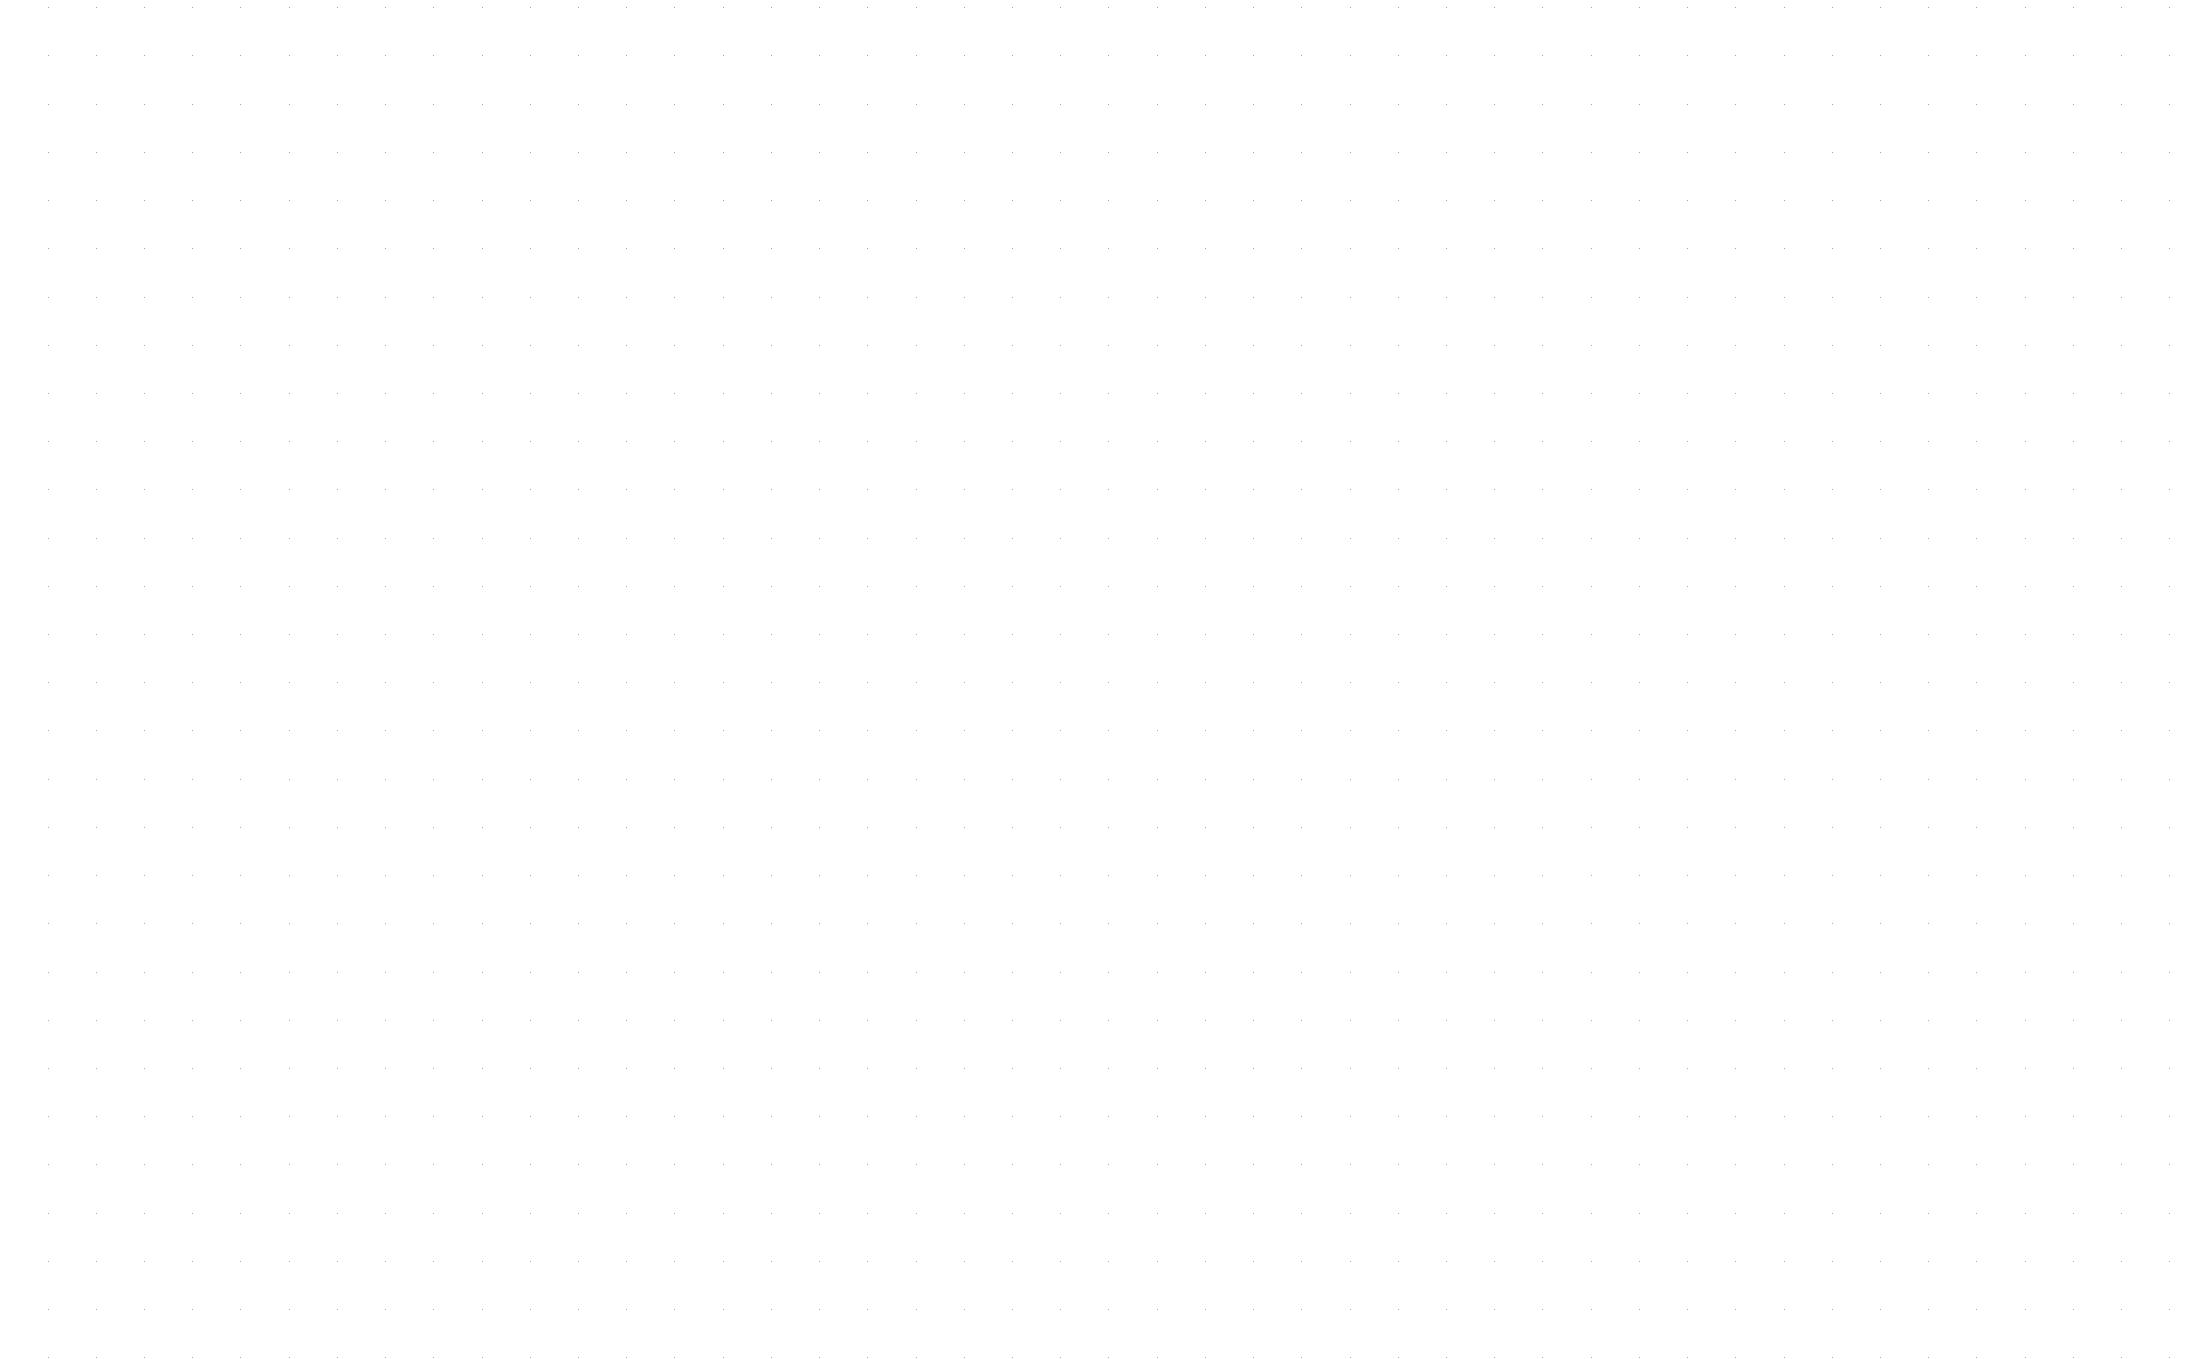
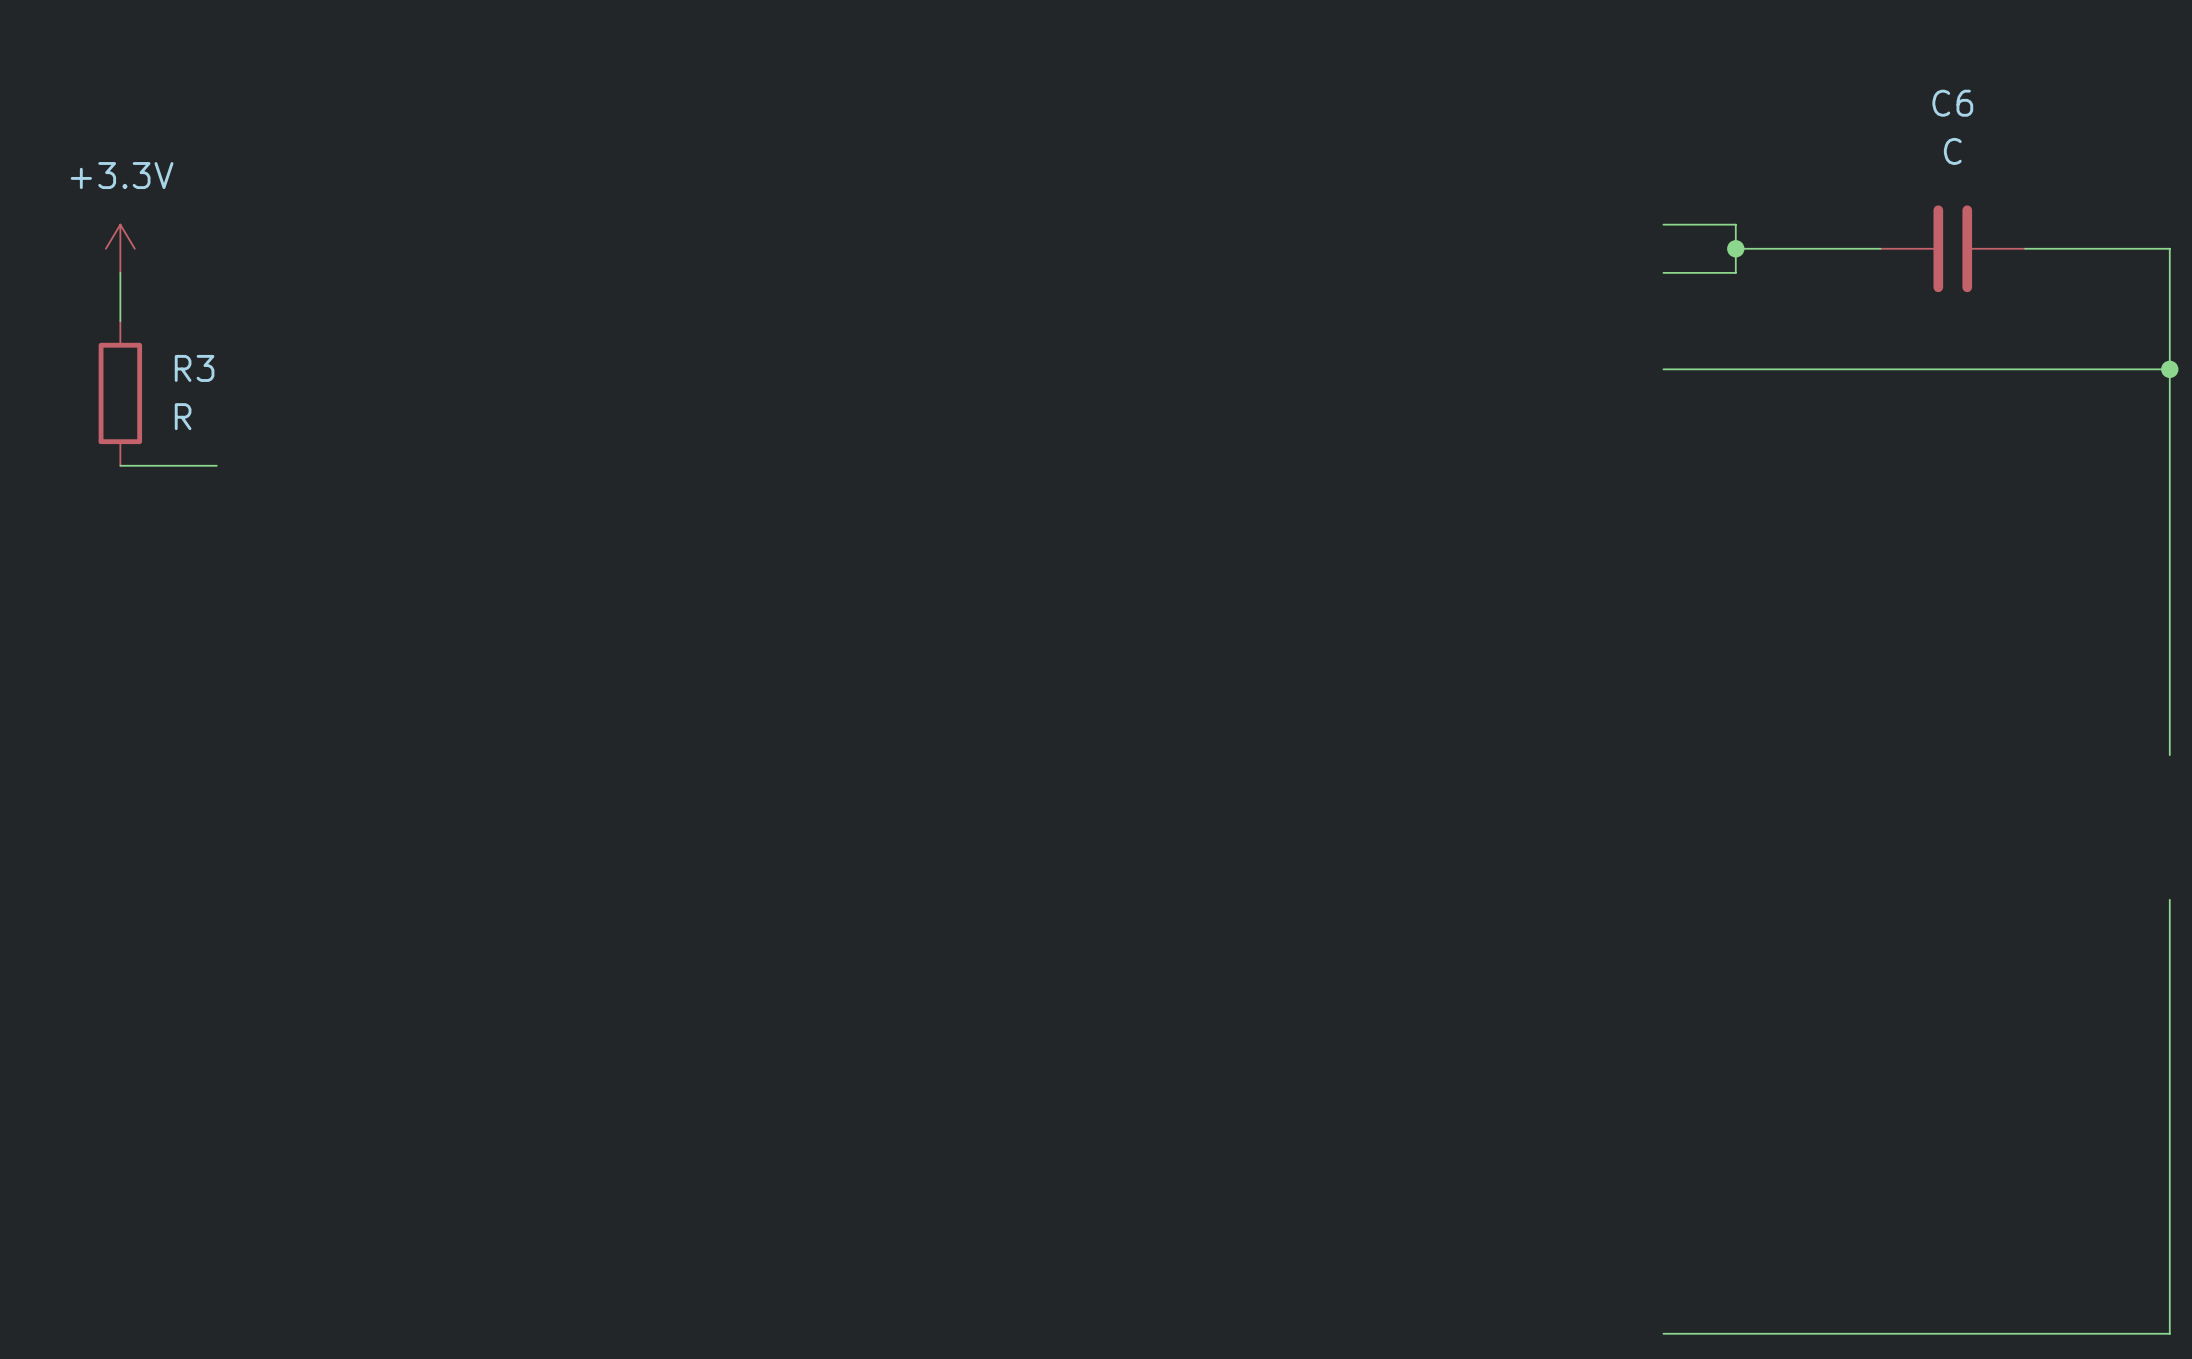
wire: none -> (1663, 224) (1735, 224) (1735, 272) (1663, 272)
power symbol: none -> +3.3V (120, 248)
wire: none -> (1735, 248) (1880, 248)
junction: none -> (1735, 248)
C6: none -> C (1952, 248)
wire: none -> (2025, 248) (2169, 248) (2169, 755)
wire: none -> (120, 272) (120, 321)
wire: none -> (1663, 369) (2169, 369)
junction: none -> (2169, 369)
R3: none -> R (120, 393)
wire: none -> (120, 465) (216, 465)
wire: none -> (2169, 899) (2169, 1333) (1663, 1333)

